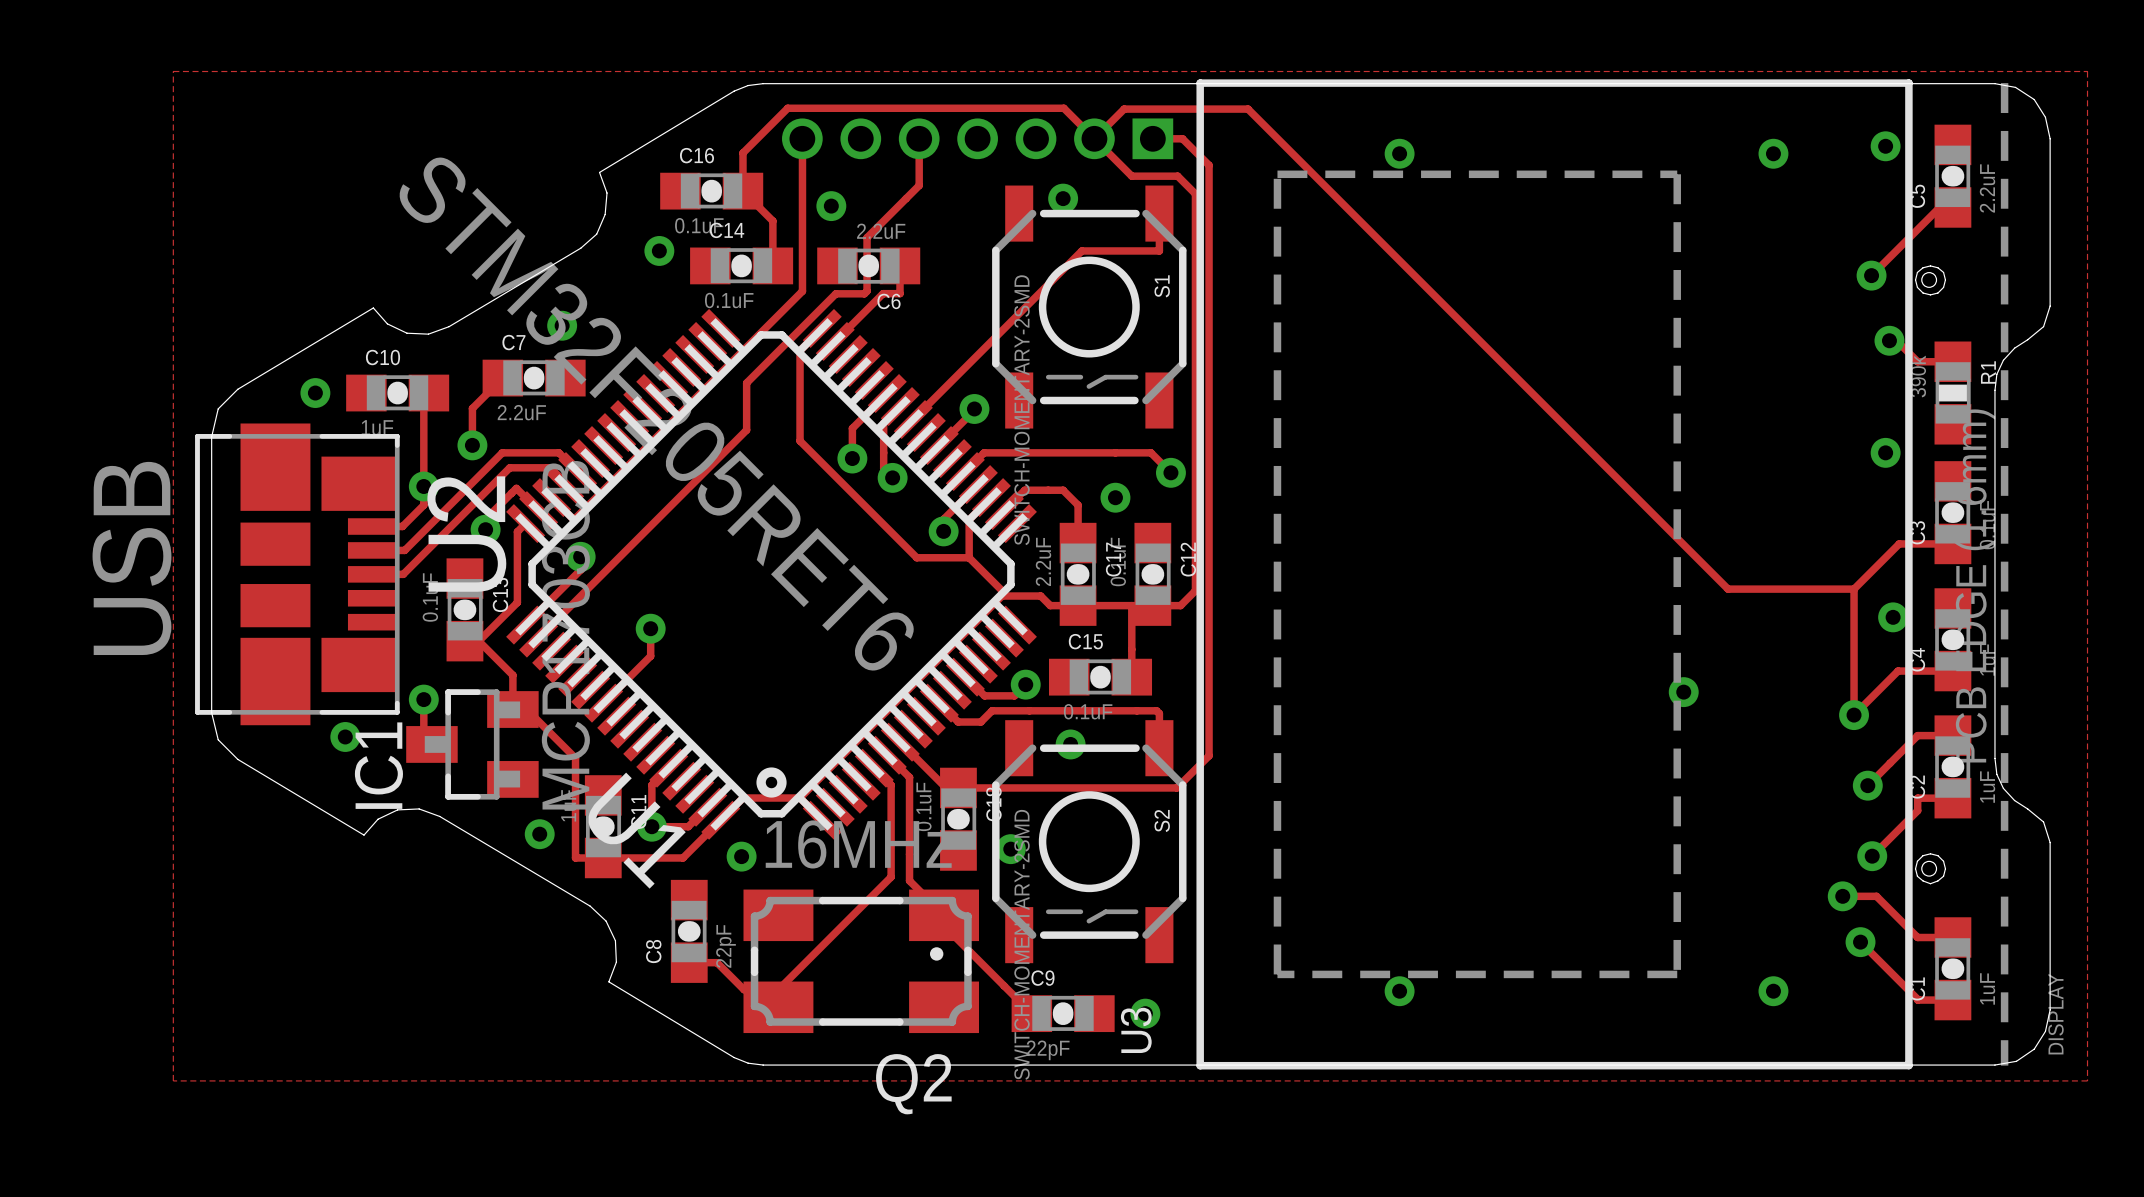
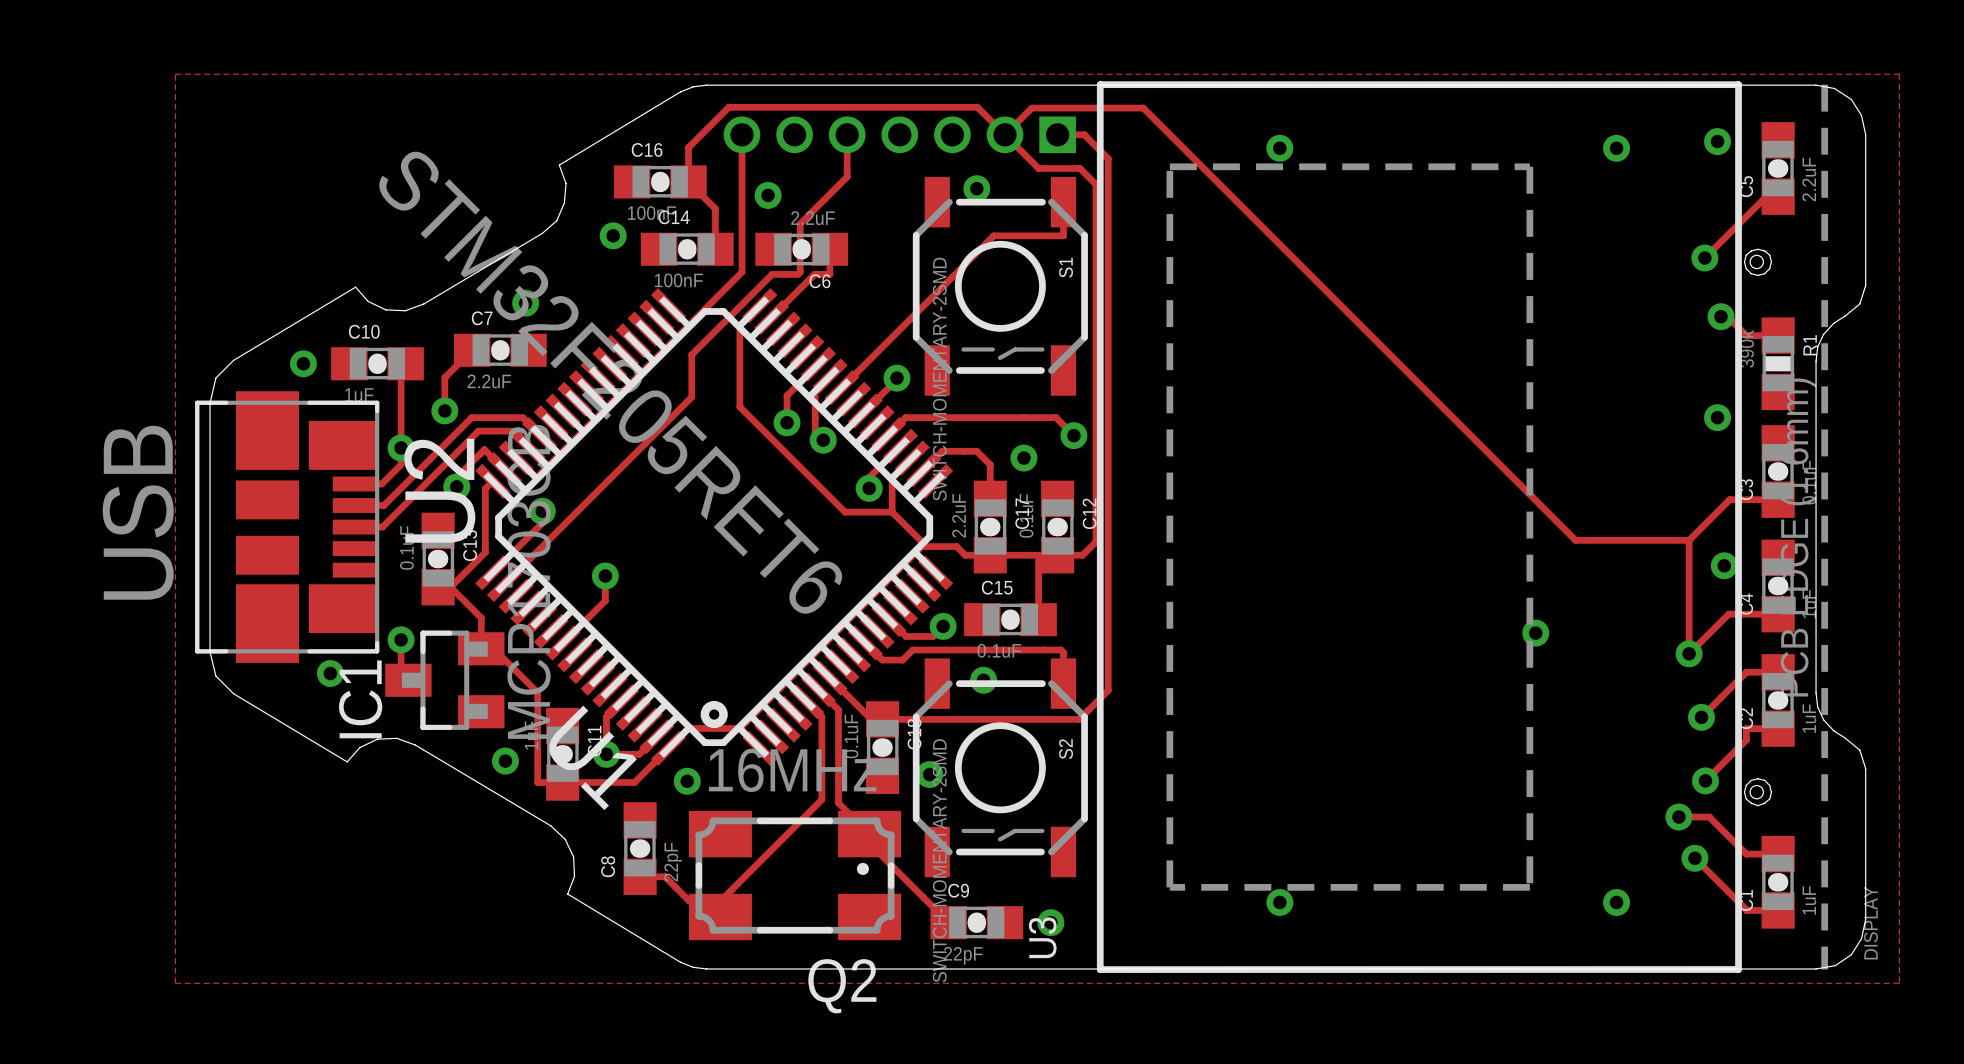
C16 value: 0.1uF (699, 225) -> 100nF (651, 213)
C14 value: 0.1uF (729, 300) -> 100nF (678, 280)

